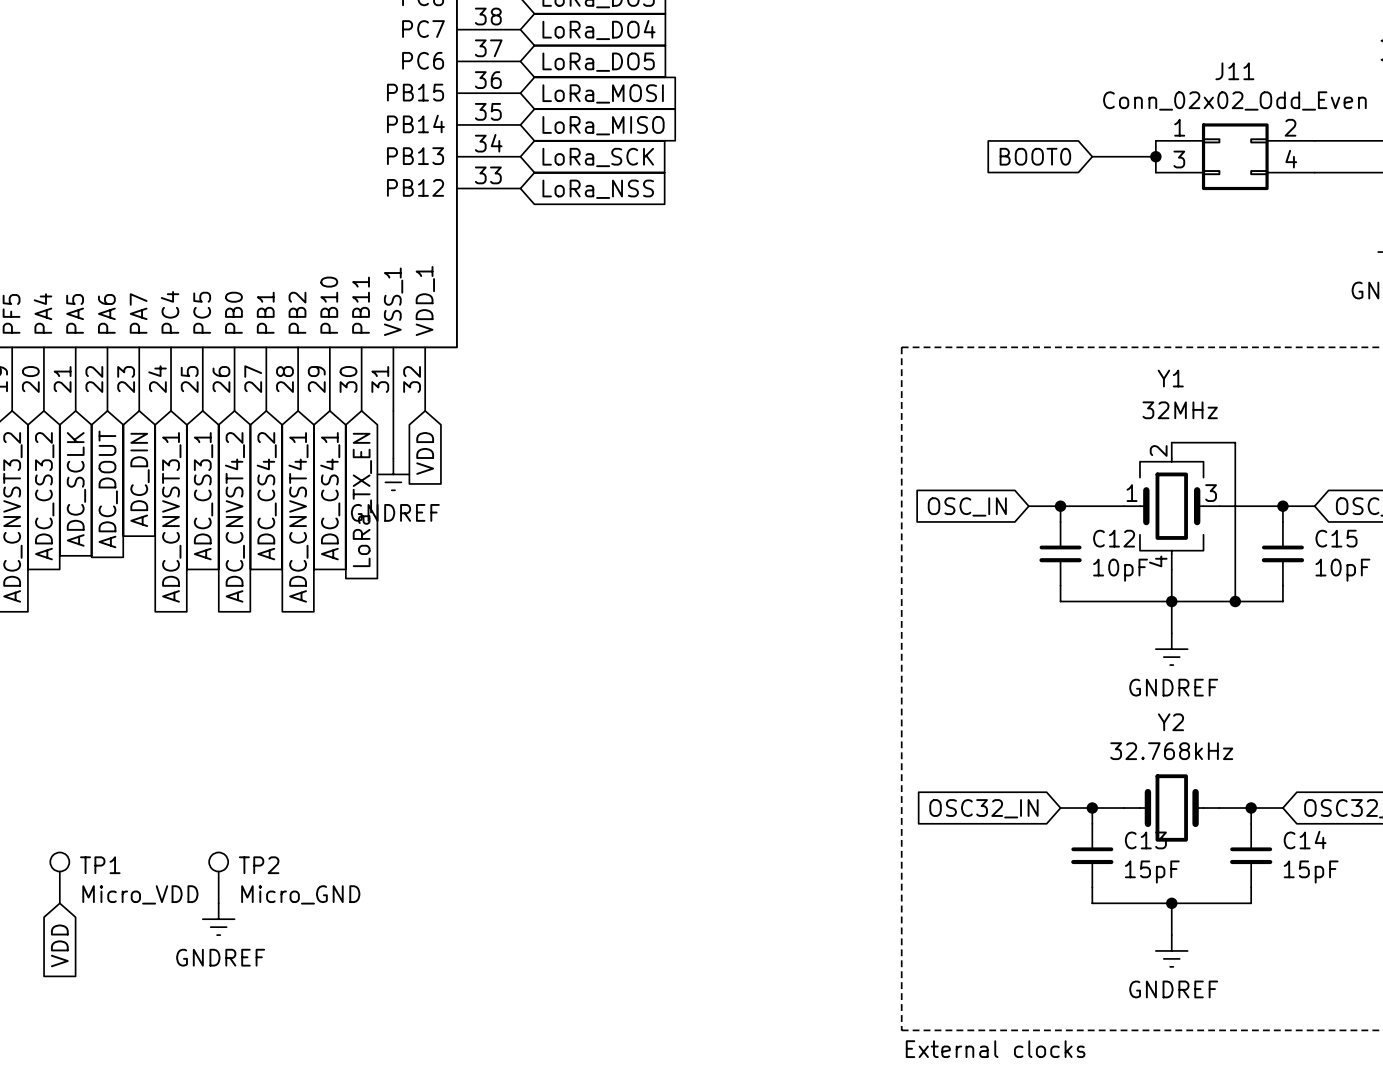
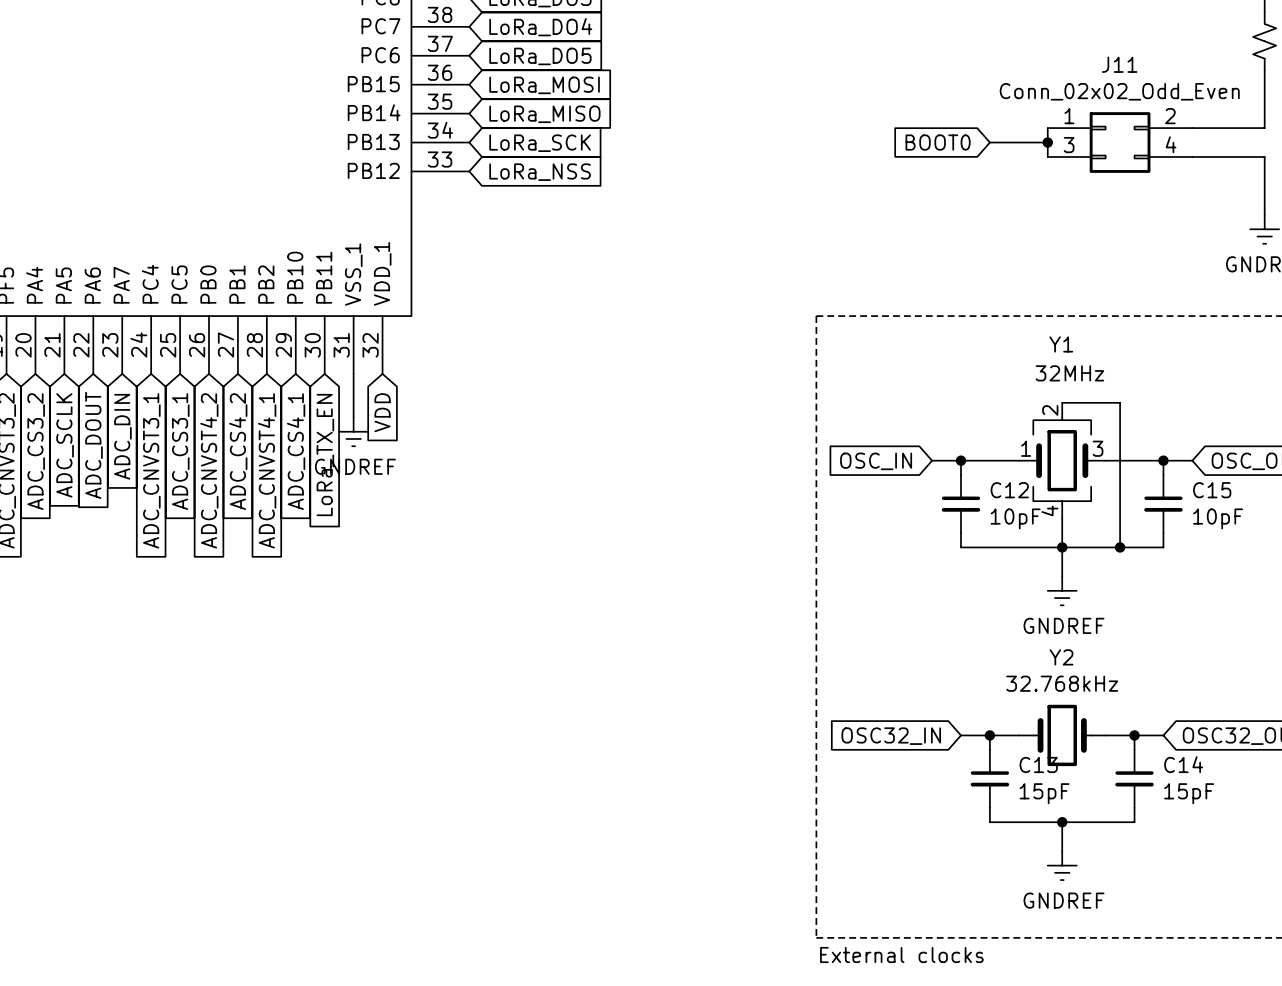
TP1: Micro_VDD (59, 877) -> none
TP2: Micro_GND (218, 877) -> none
power symbol: GNDREF (218, 919) -> none
global label: VDD (59, 945) -> none

